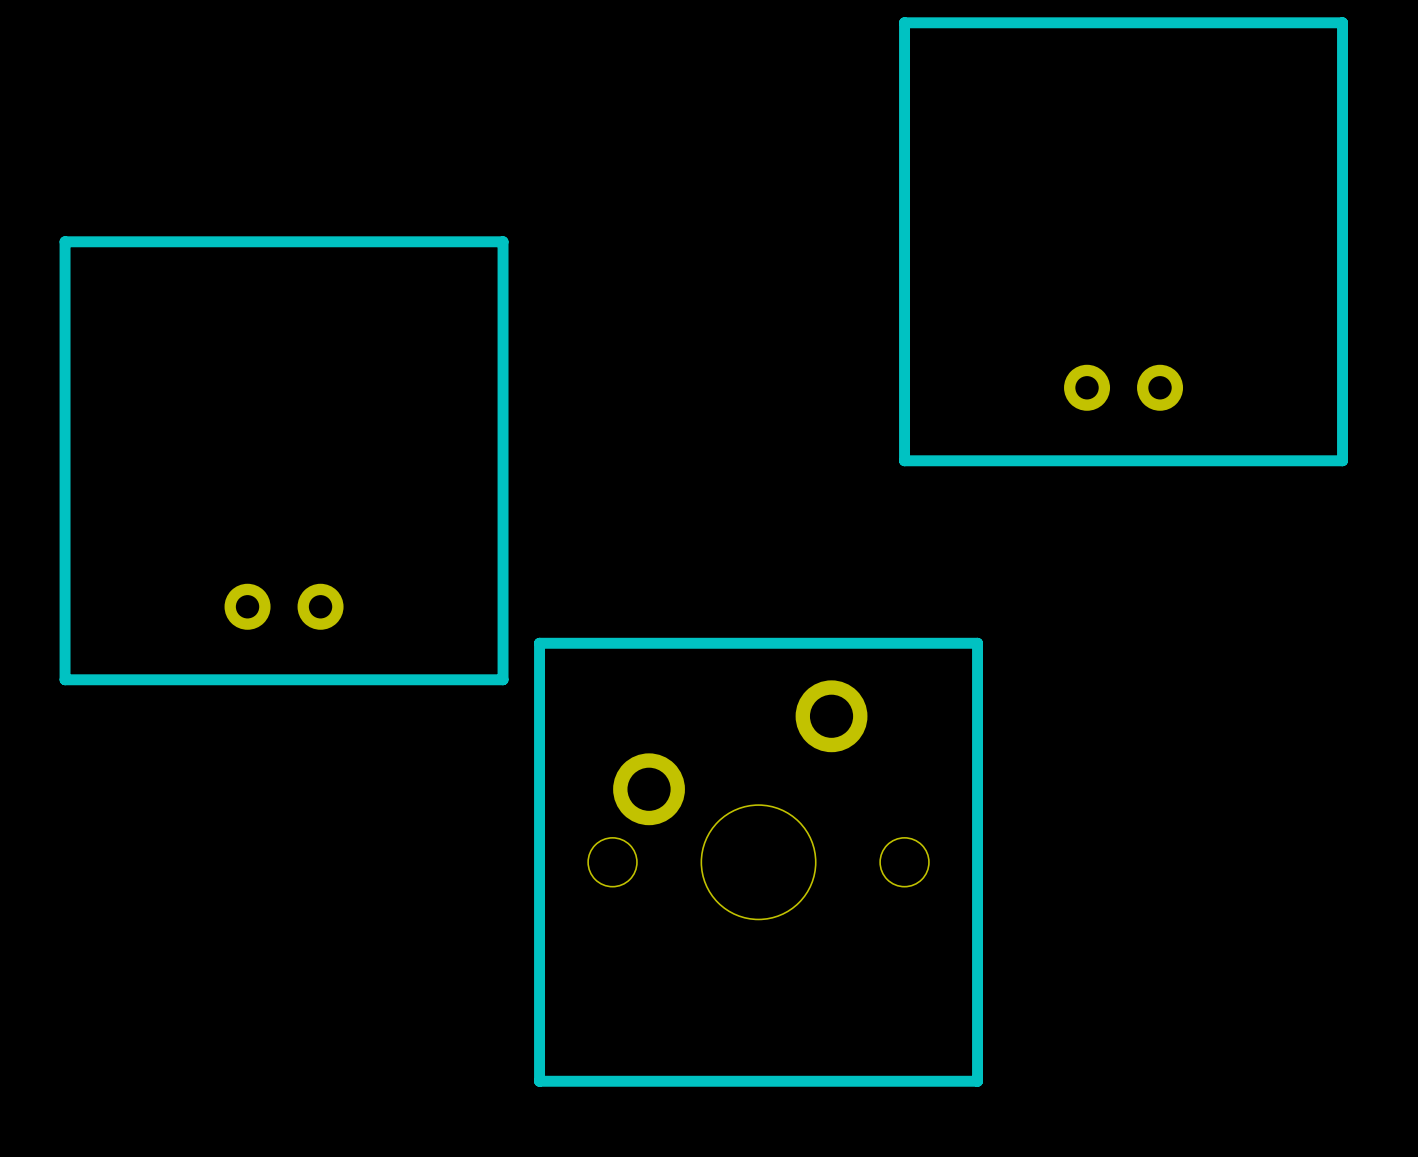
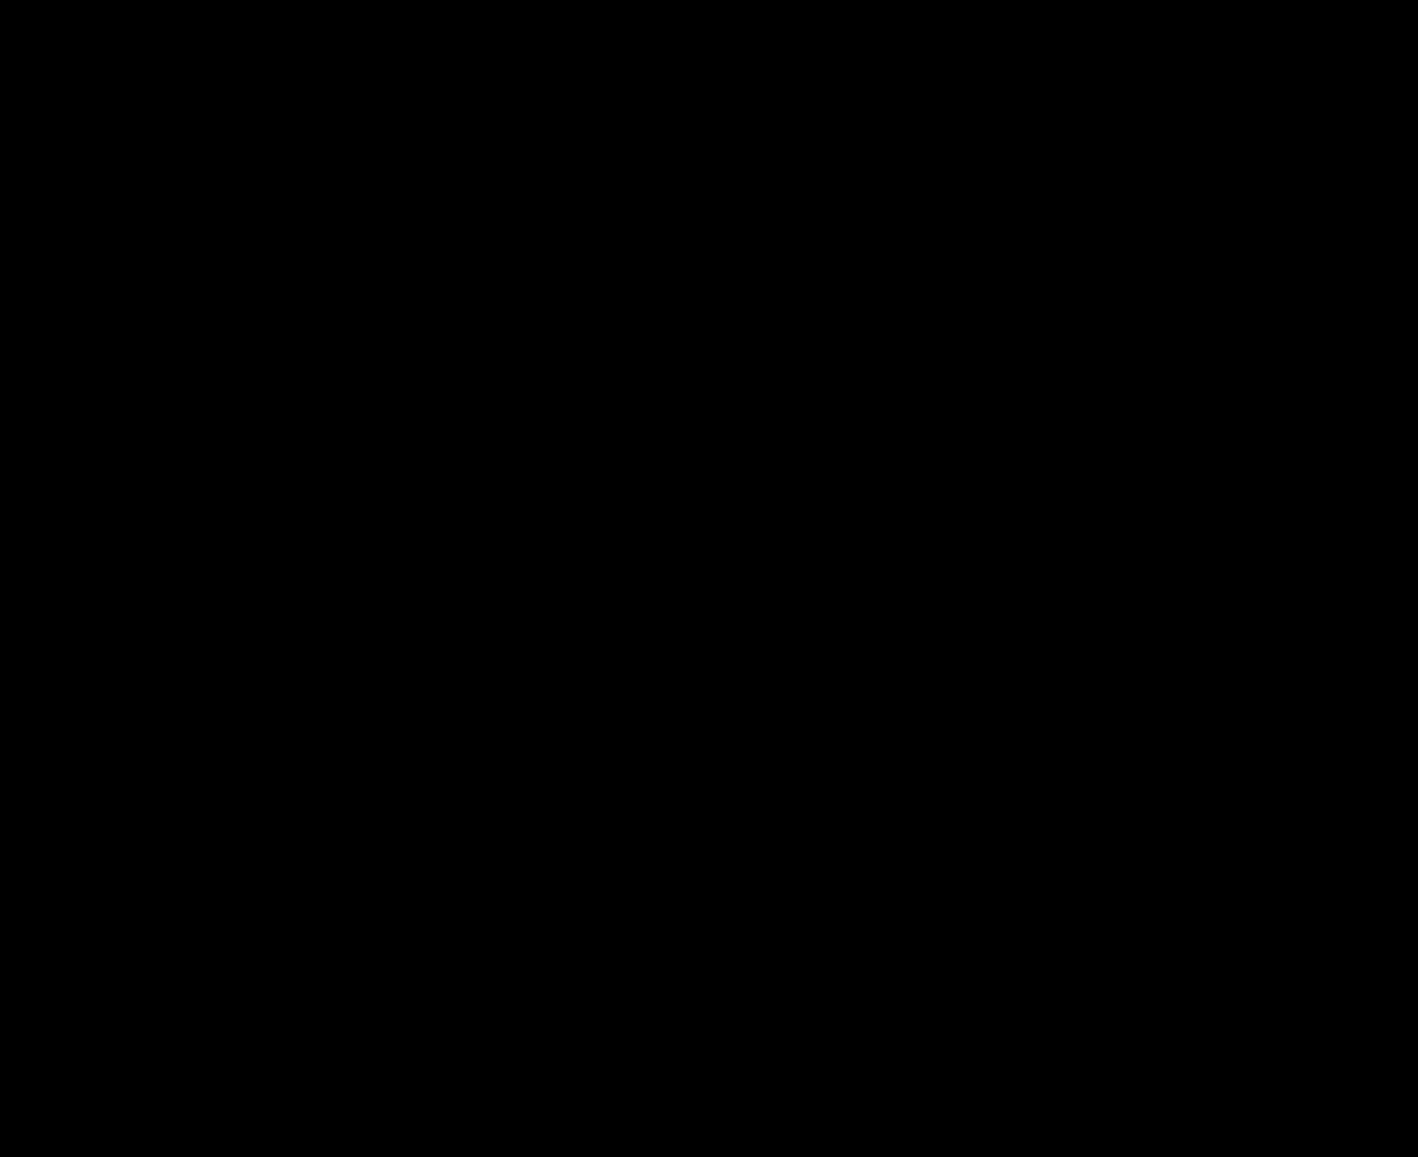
part: (1123, 241) -> none
part: (284, 460) -> none
part: (758, 862) -> none

